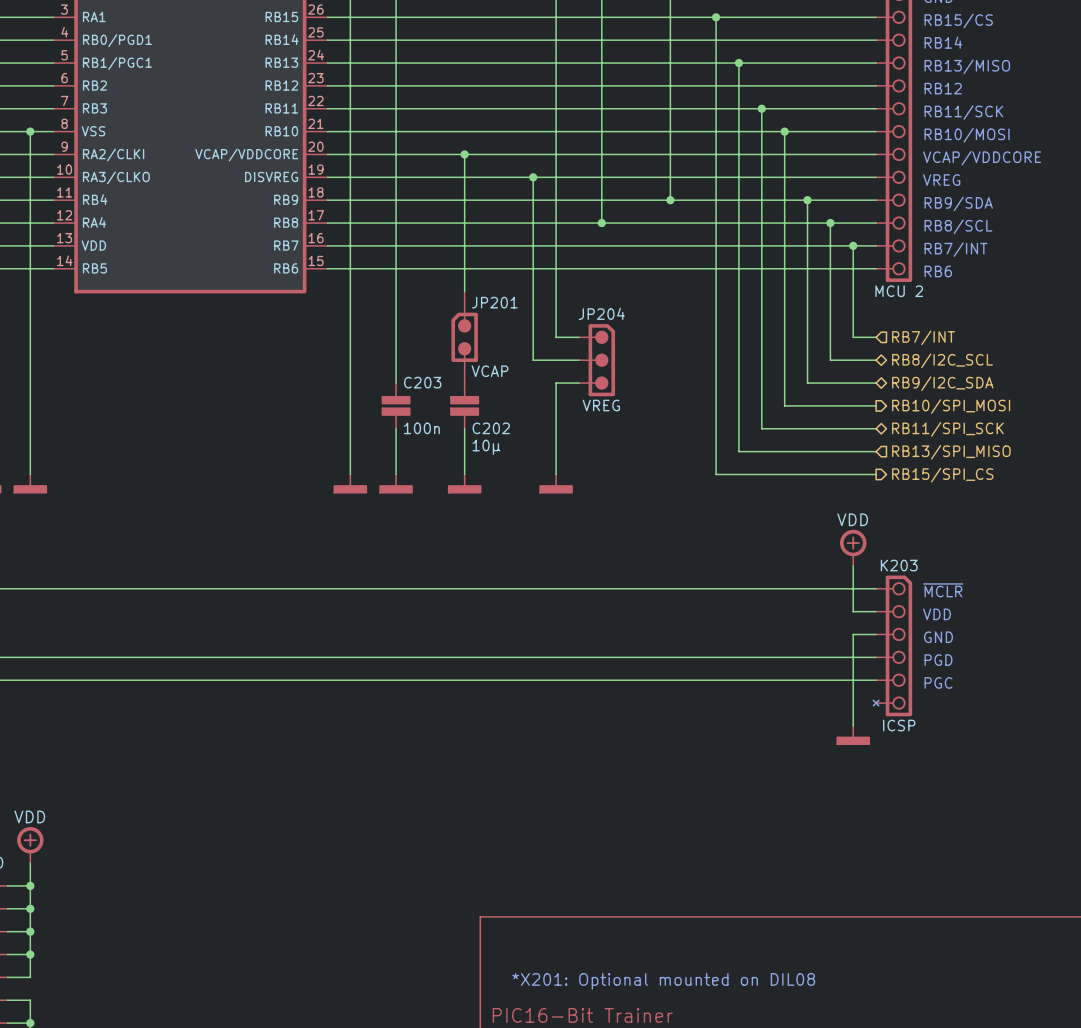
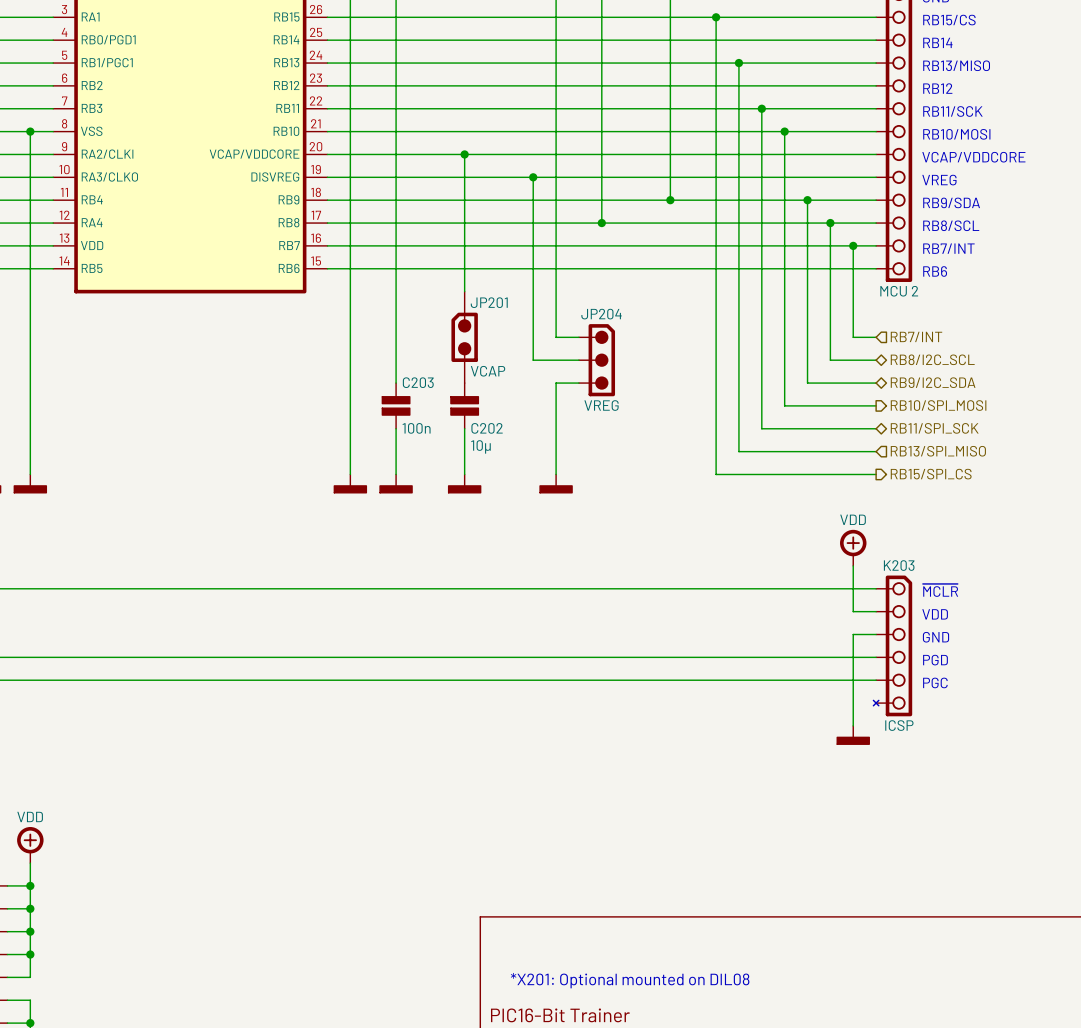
power symbol text: VDD (852, 519) -> none
power symbol text: none -> VDD (853, 519)
power symbol text: VDD (29, 816) -> none
power symbol text: none -> VDD (30, 816)

